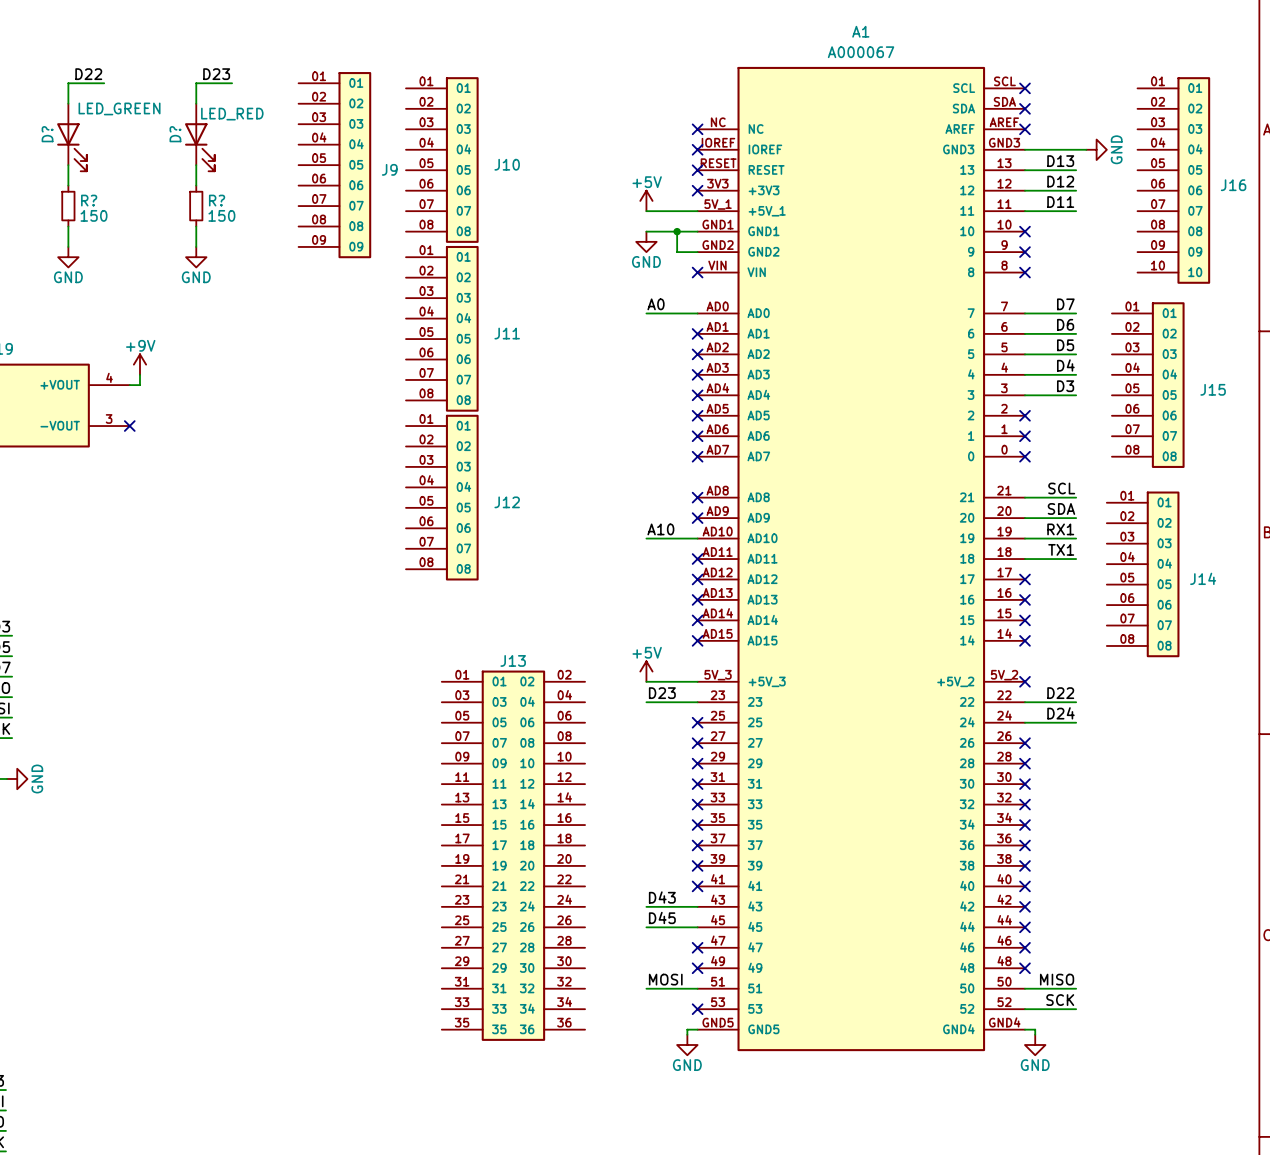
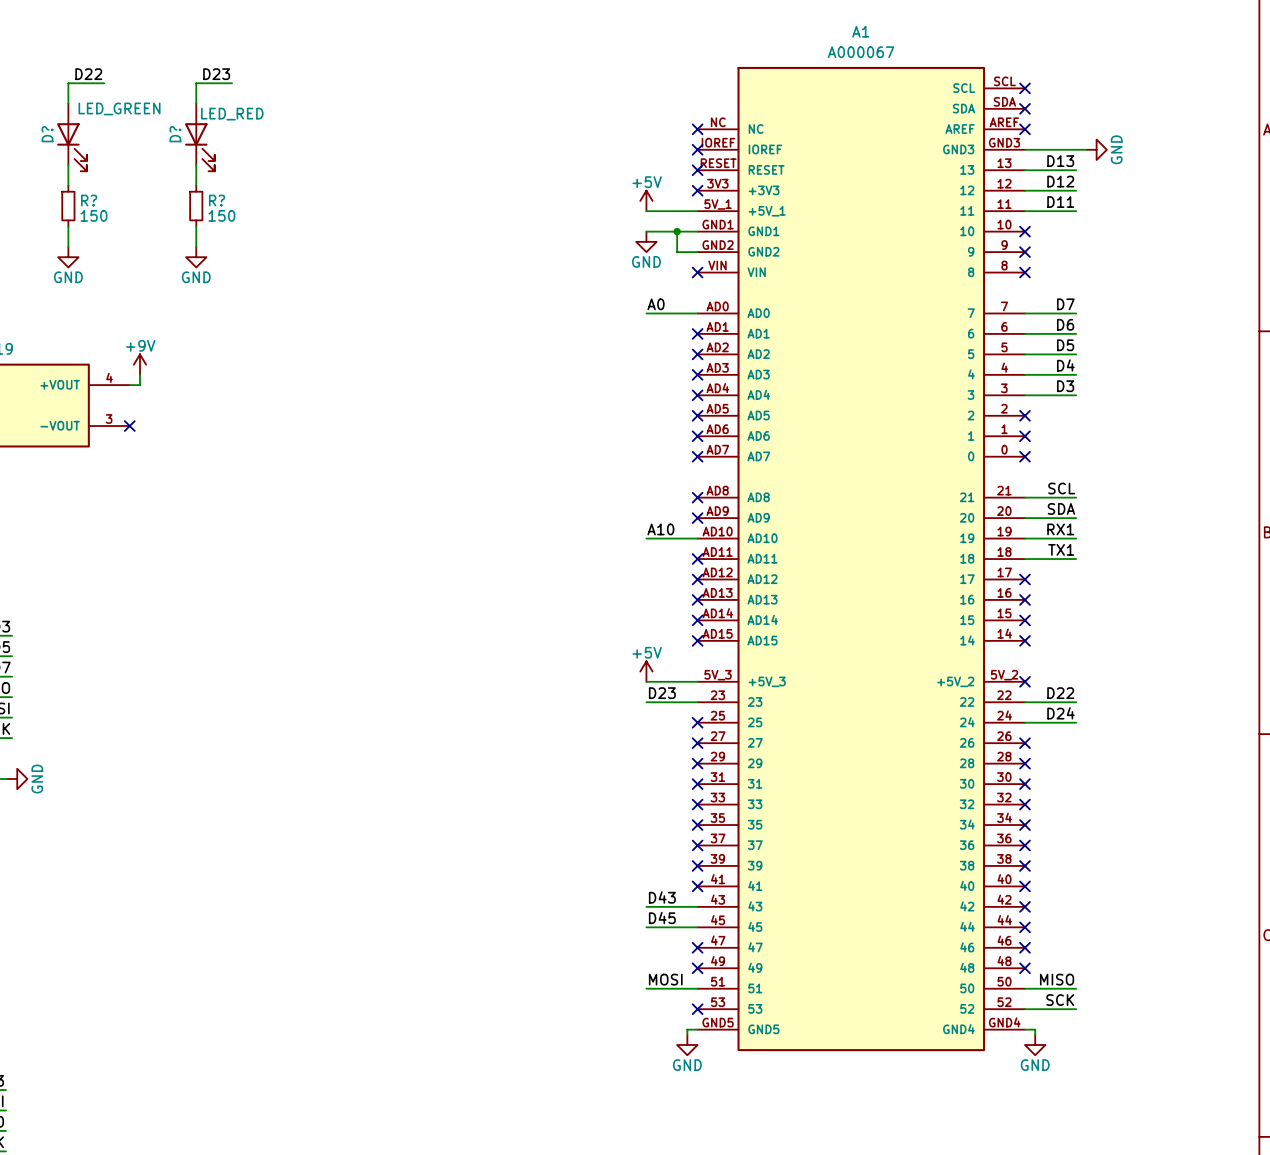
J10: (442, 160) -> none
J9: (334, 165) -> none
J16: (1173, 180) -> none
J11: (442, 328) -> none
J15: (1148, 385) -> none
J12: (442, 497) -> none
J14: (1143, 574) -> none
J13: (513, 855) -> none

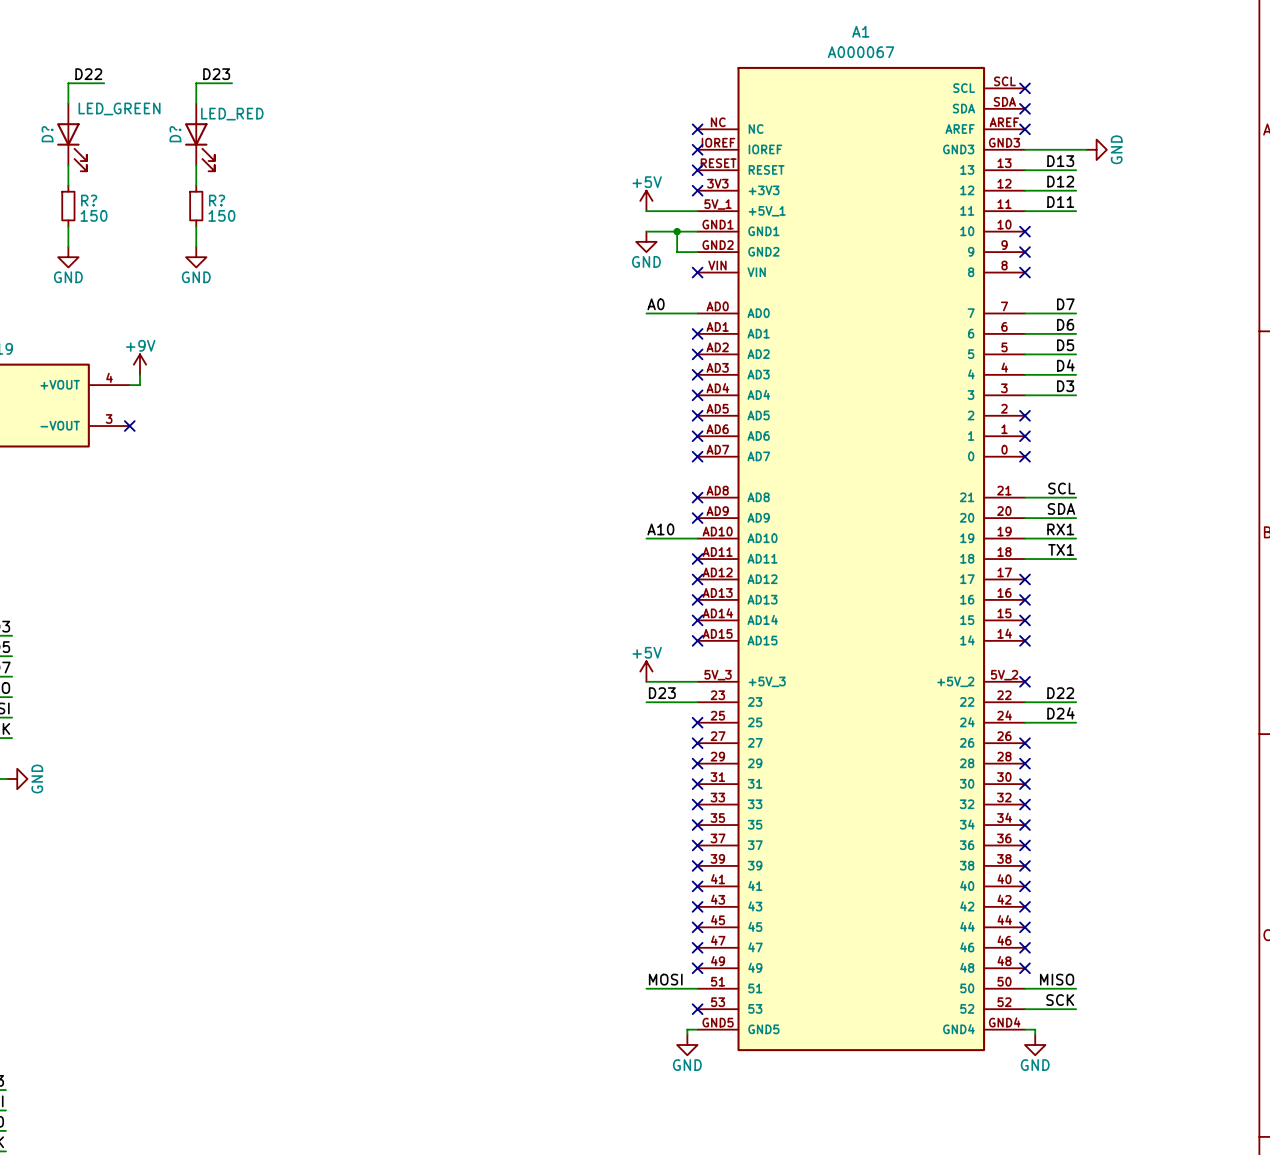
label: D43 (662, 897) -> none
wire: (646, 906) (697, 906) -> none
no-connect mark: none -> (697, 906)
label: D45 (662, 917) -> none
wire: (646, 927) (697, 927) -> none
no-connect mark: none -> (697, 927)

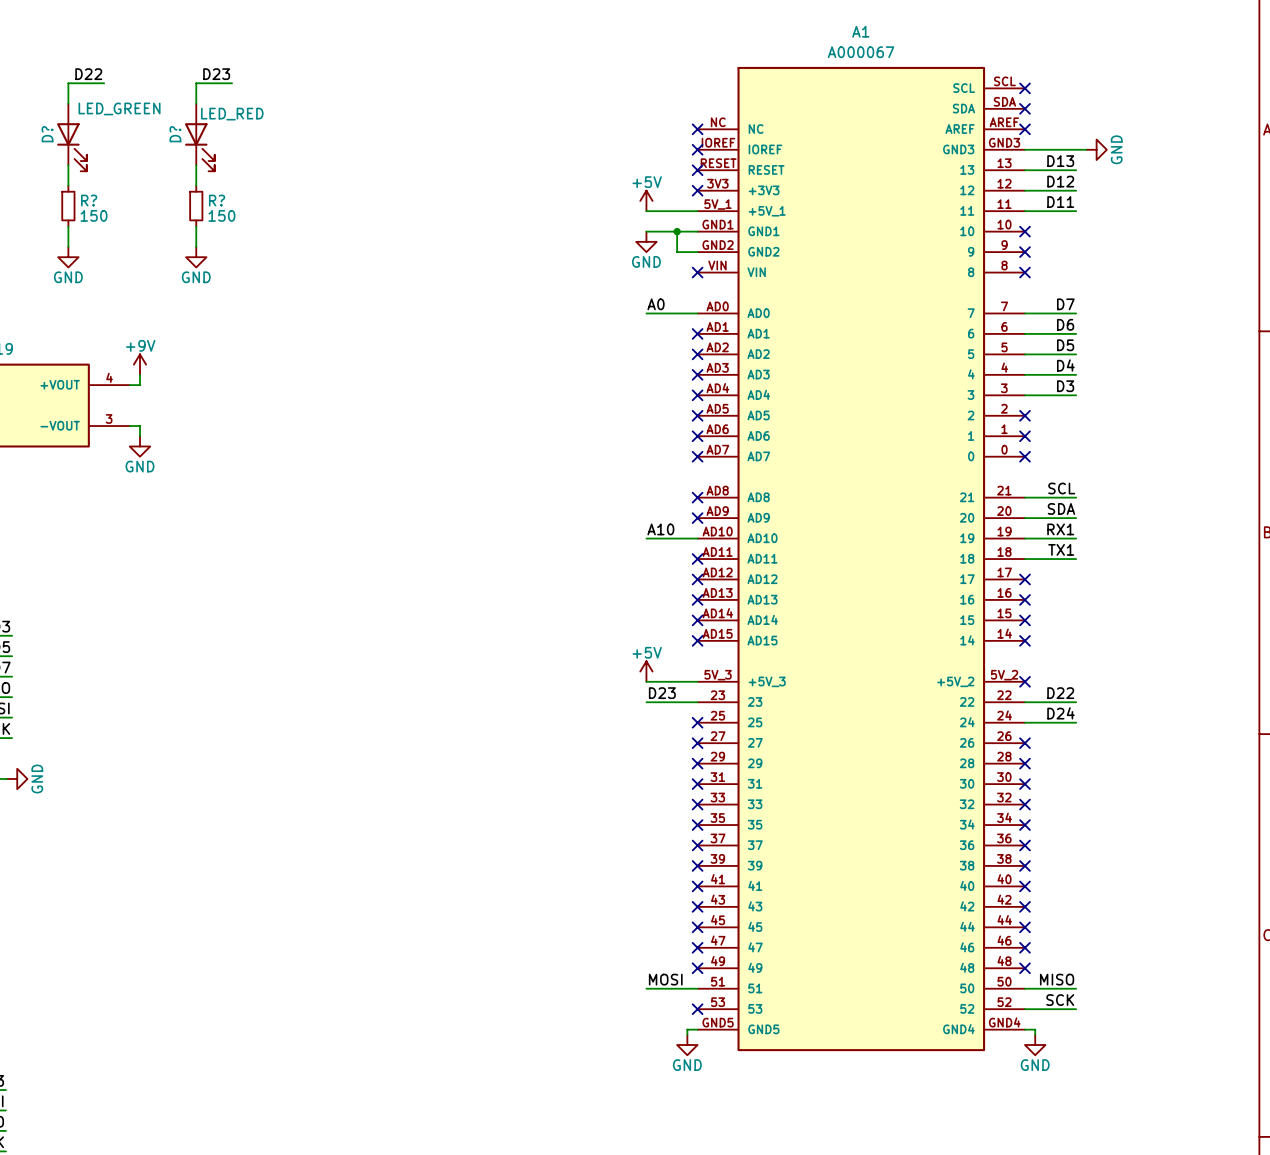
wire: none -> (129, 426) (140, 426) (140, 436)
no-connect mark: (129, 426) -> none
power symbol: none -> GND (140, 446)

